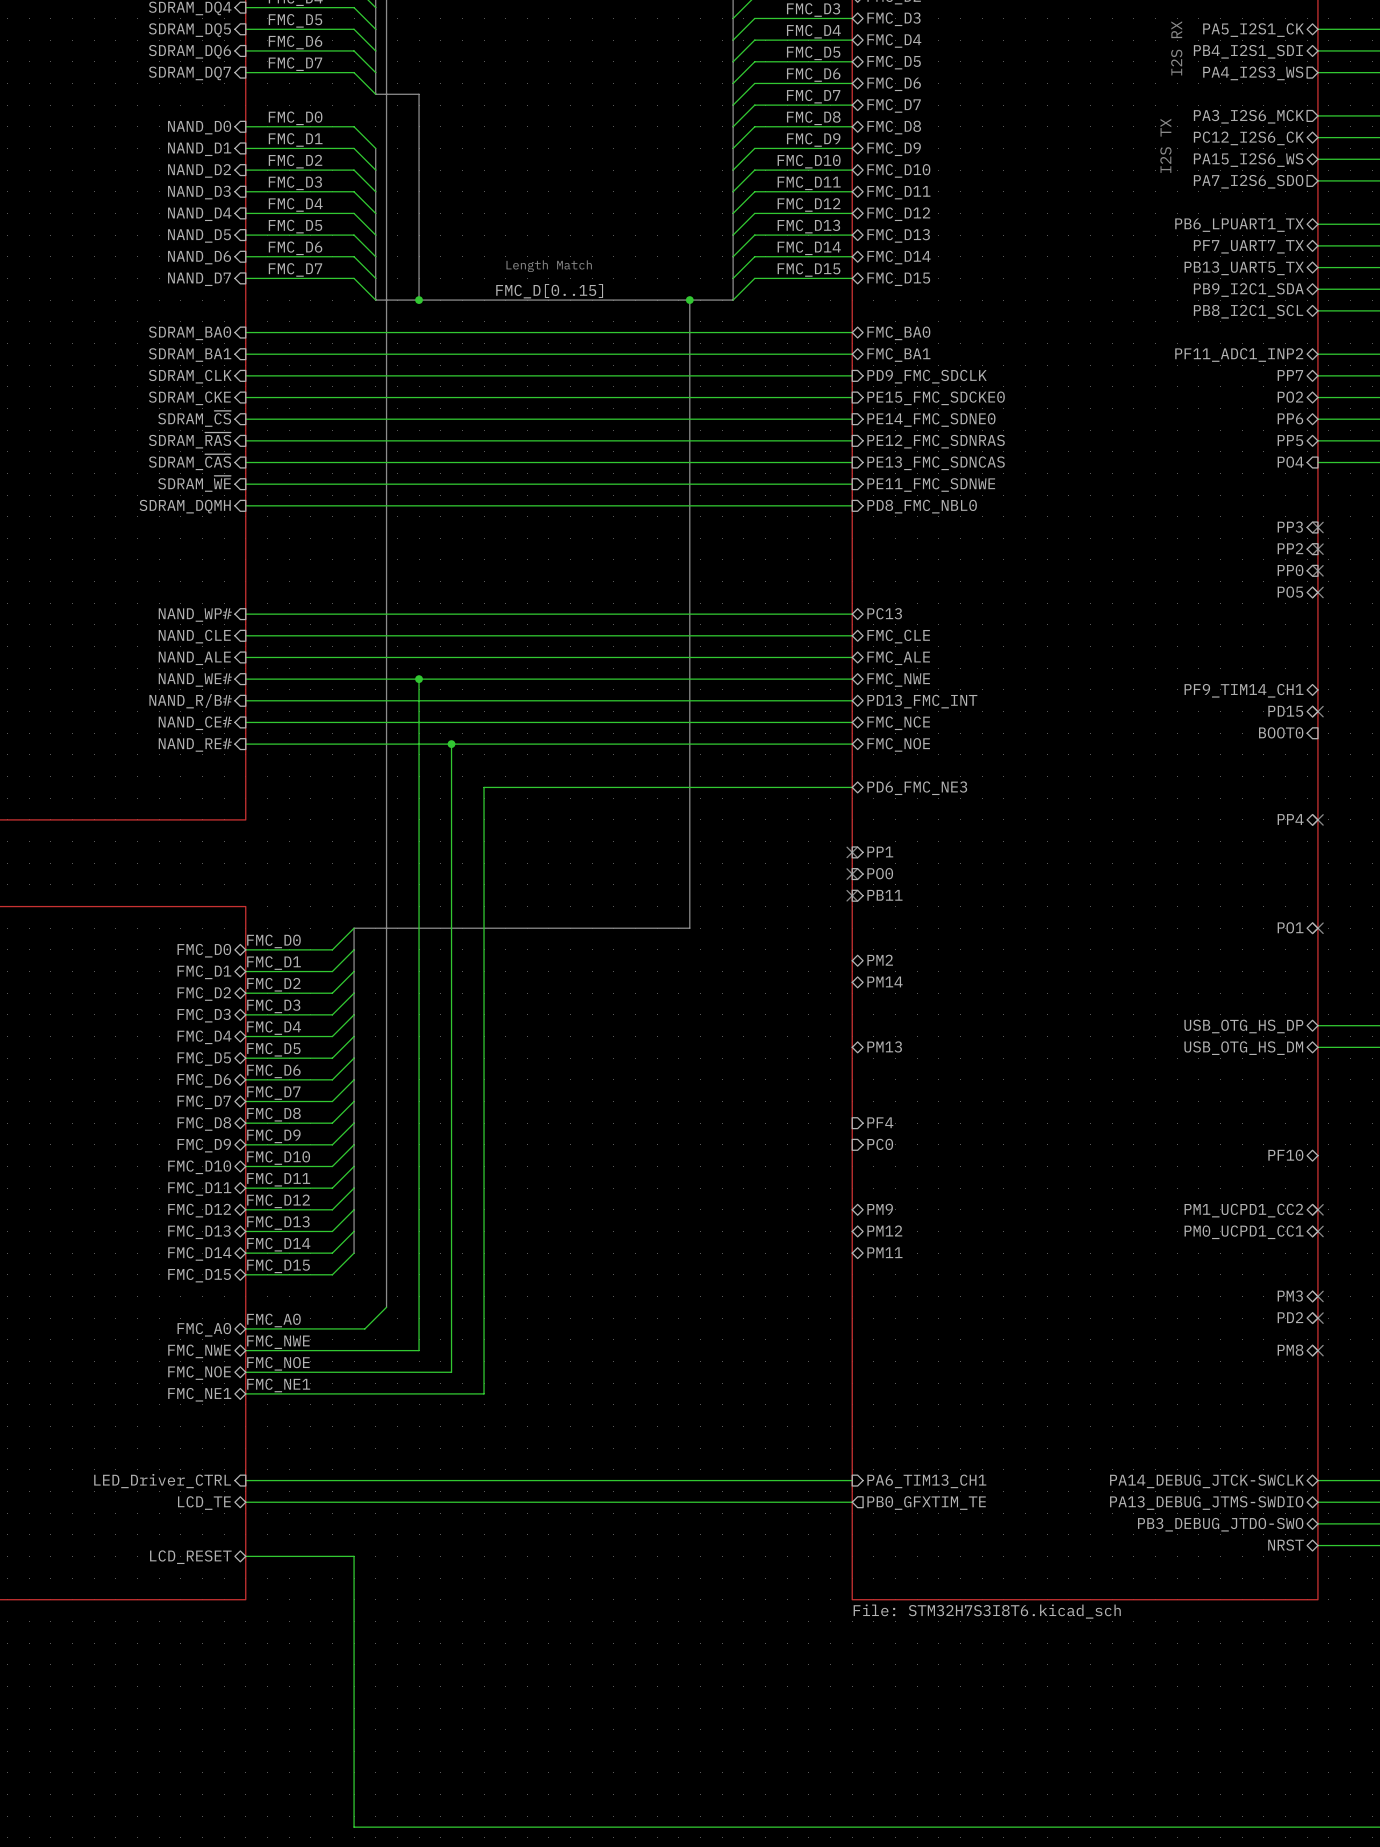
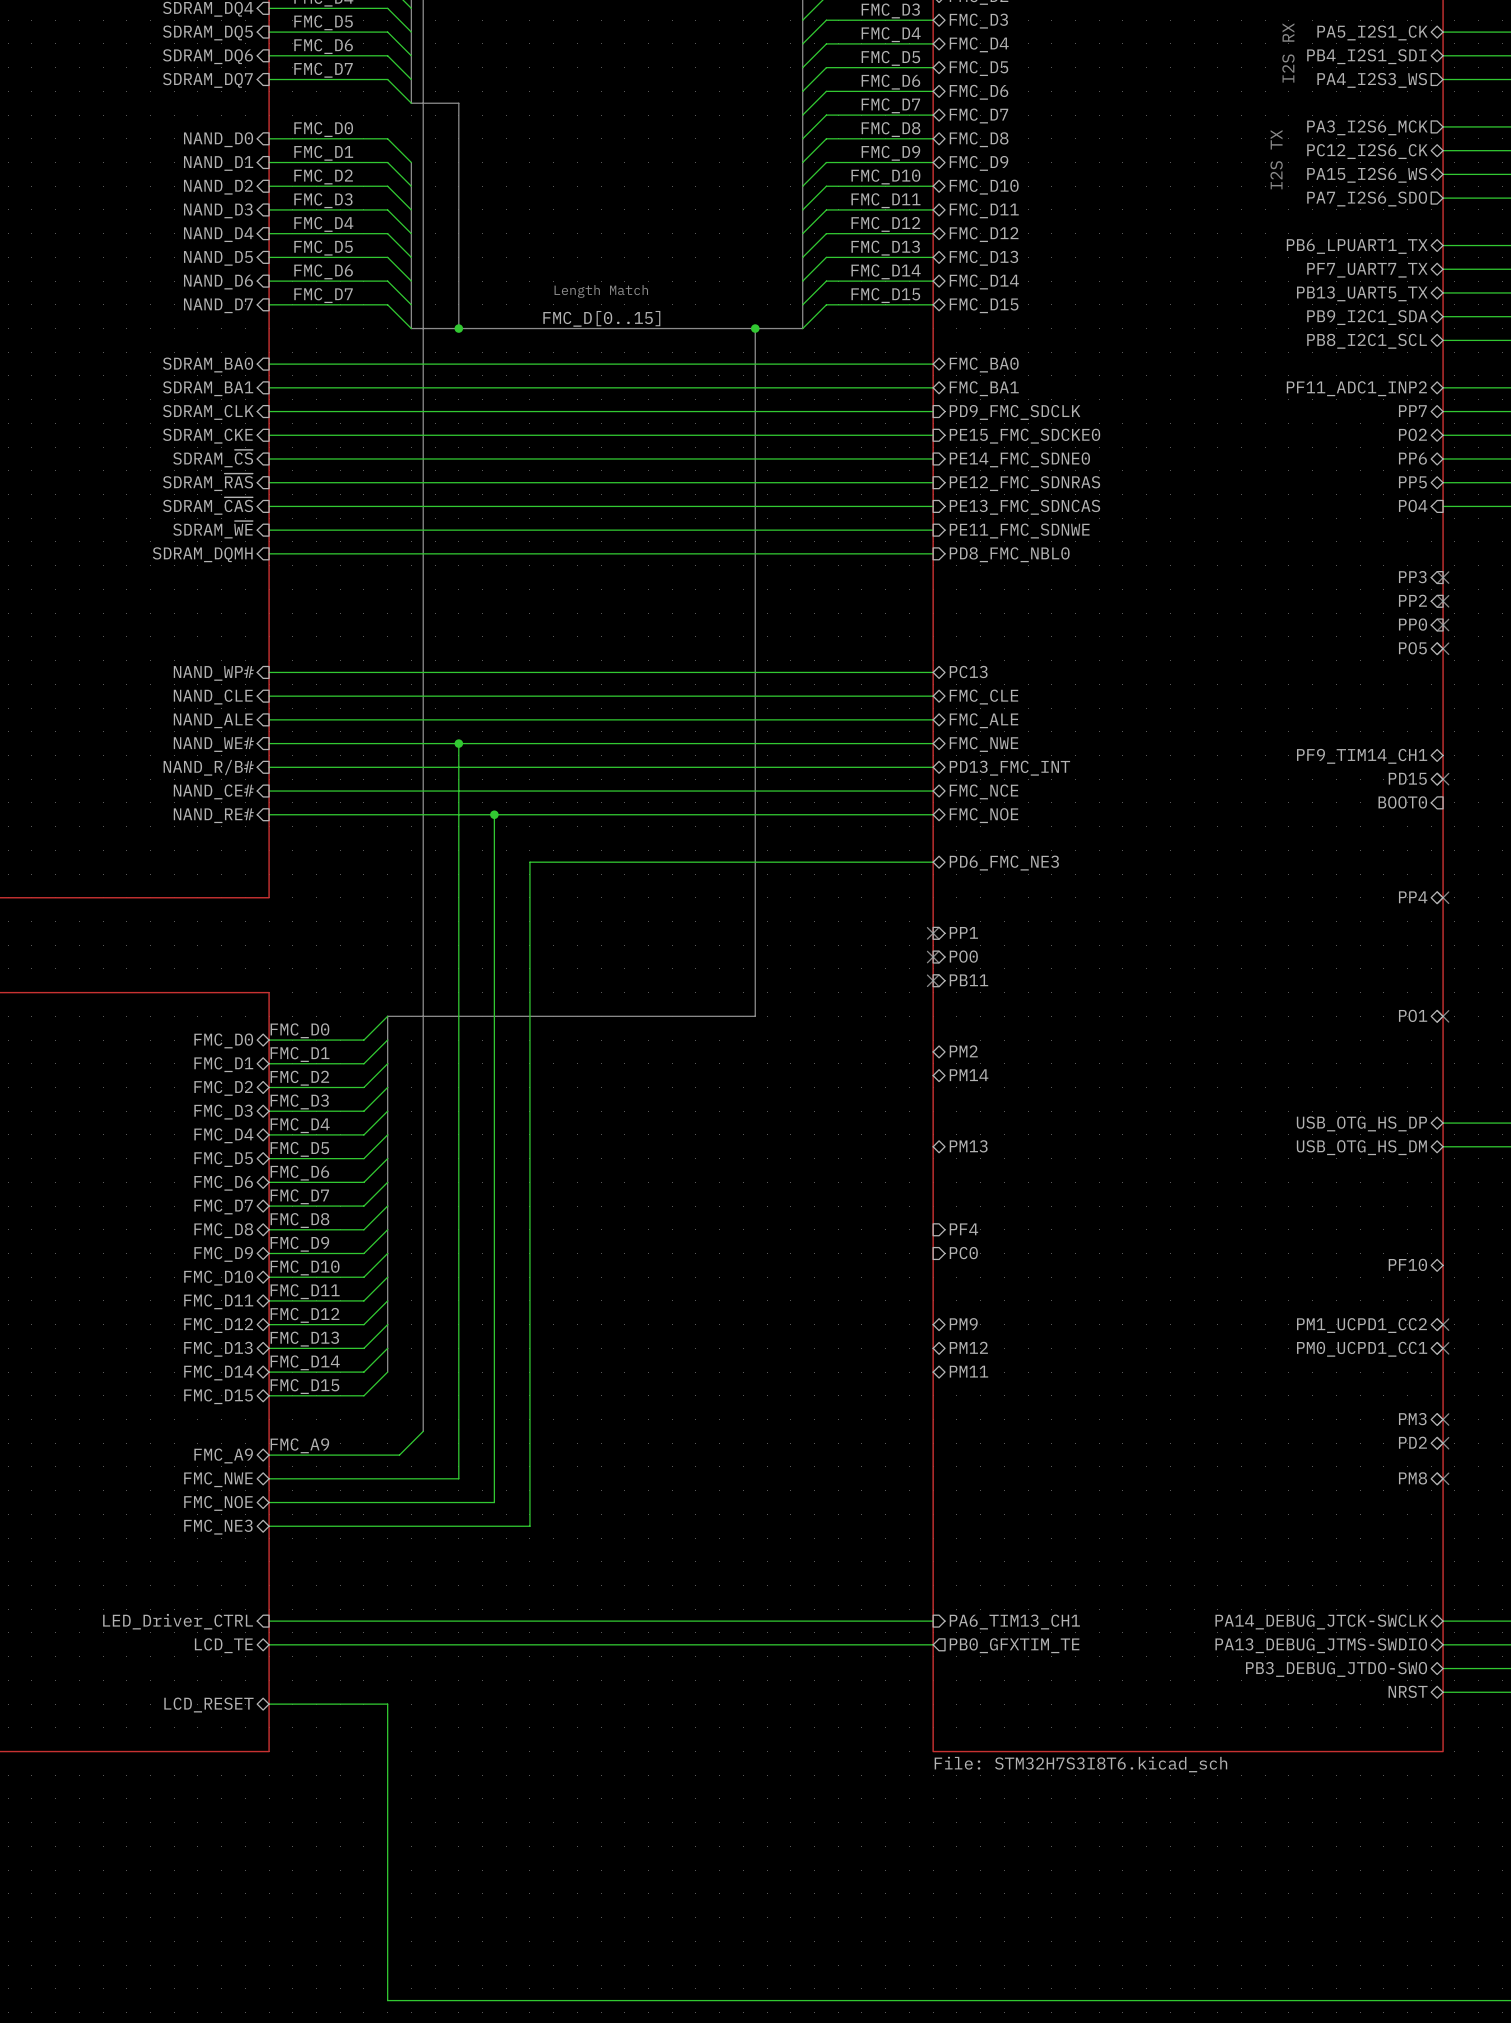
label: FMC_A0 (273, 1320) -> FMC_A9 (299, 1445)
sheet pin: FMC_A0 (204, 1329) -> FMC_A9 (223, 1455)
label: FMC_NWE (278, 1342) -> none
label: FMC_NOE (278, 1363) -> none
label: FMC_NE1 (278, 1385) -> none
sheet pin: FMC_NE1 (199, 1394) -> FMC_NE3 (218, 1527)

